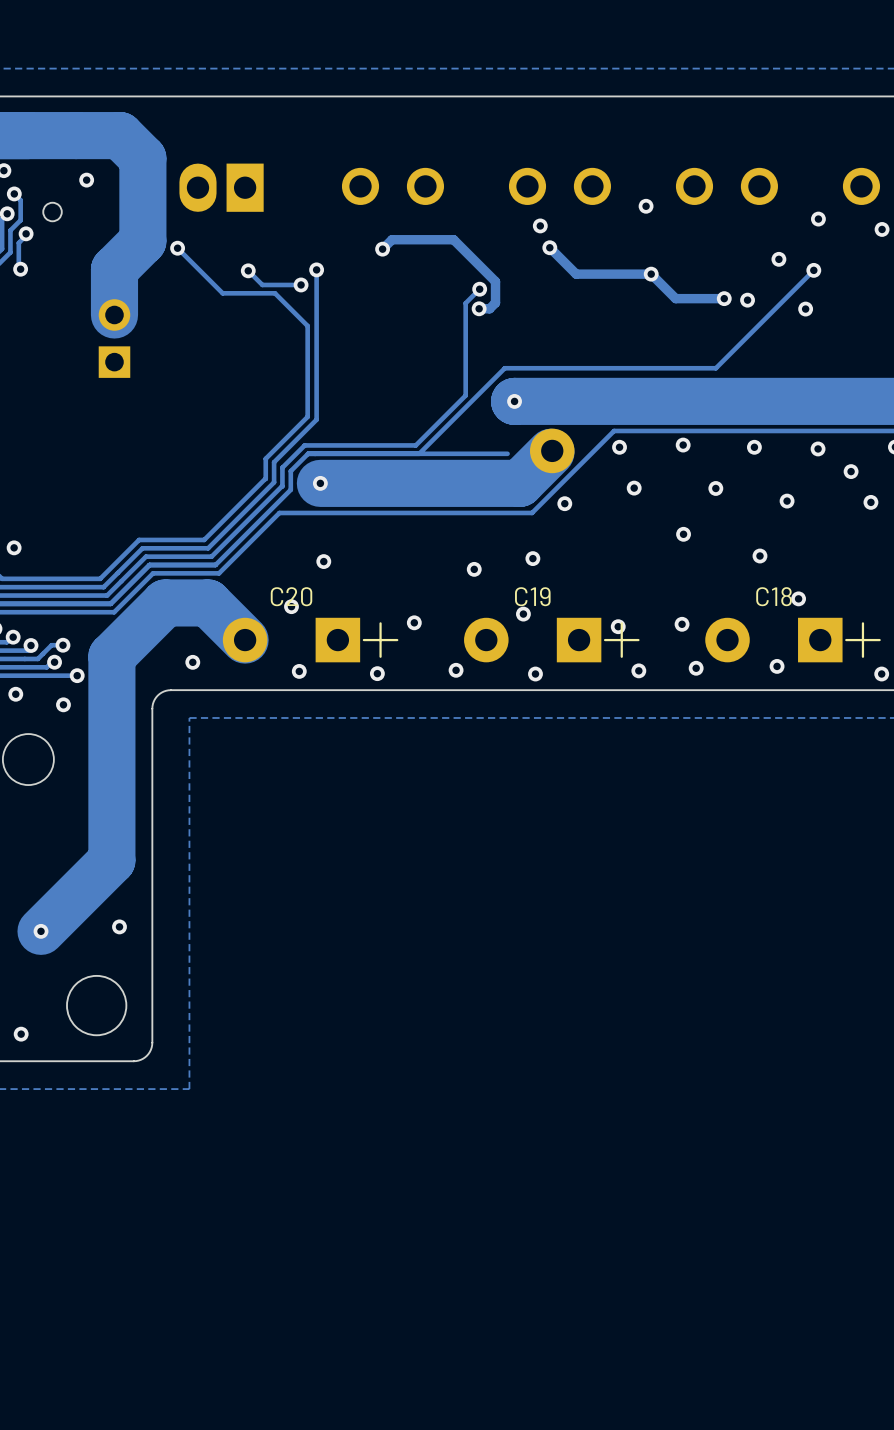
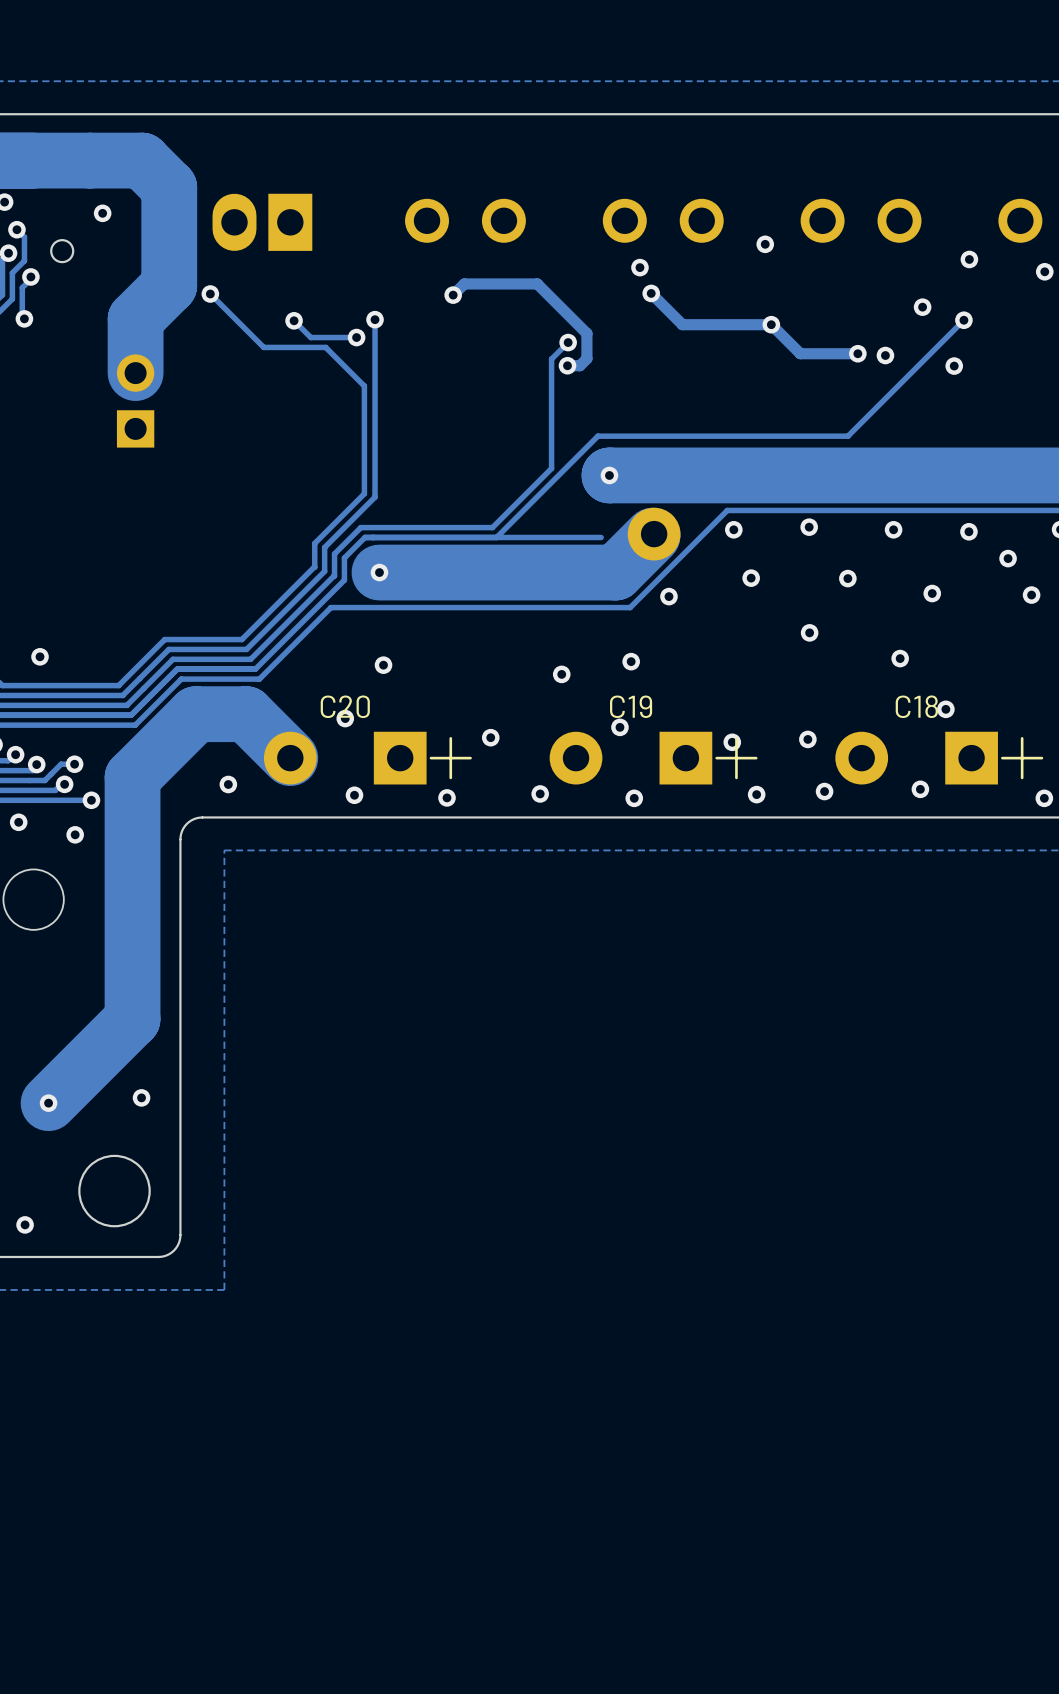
via: (14, 547) -> none
via: none -> (40, 656)

